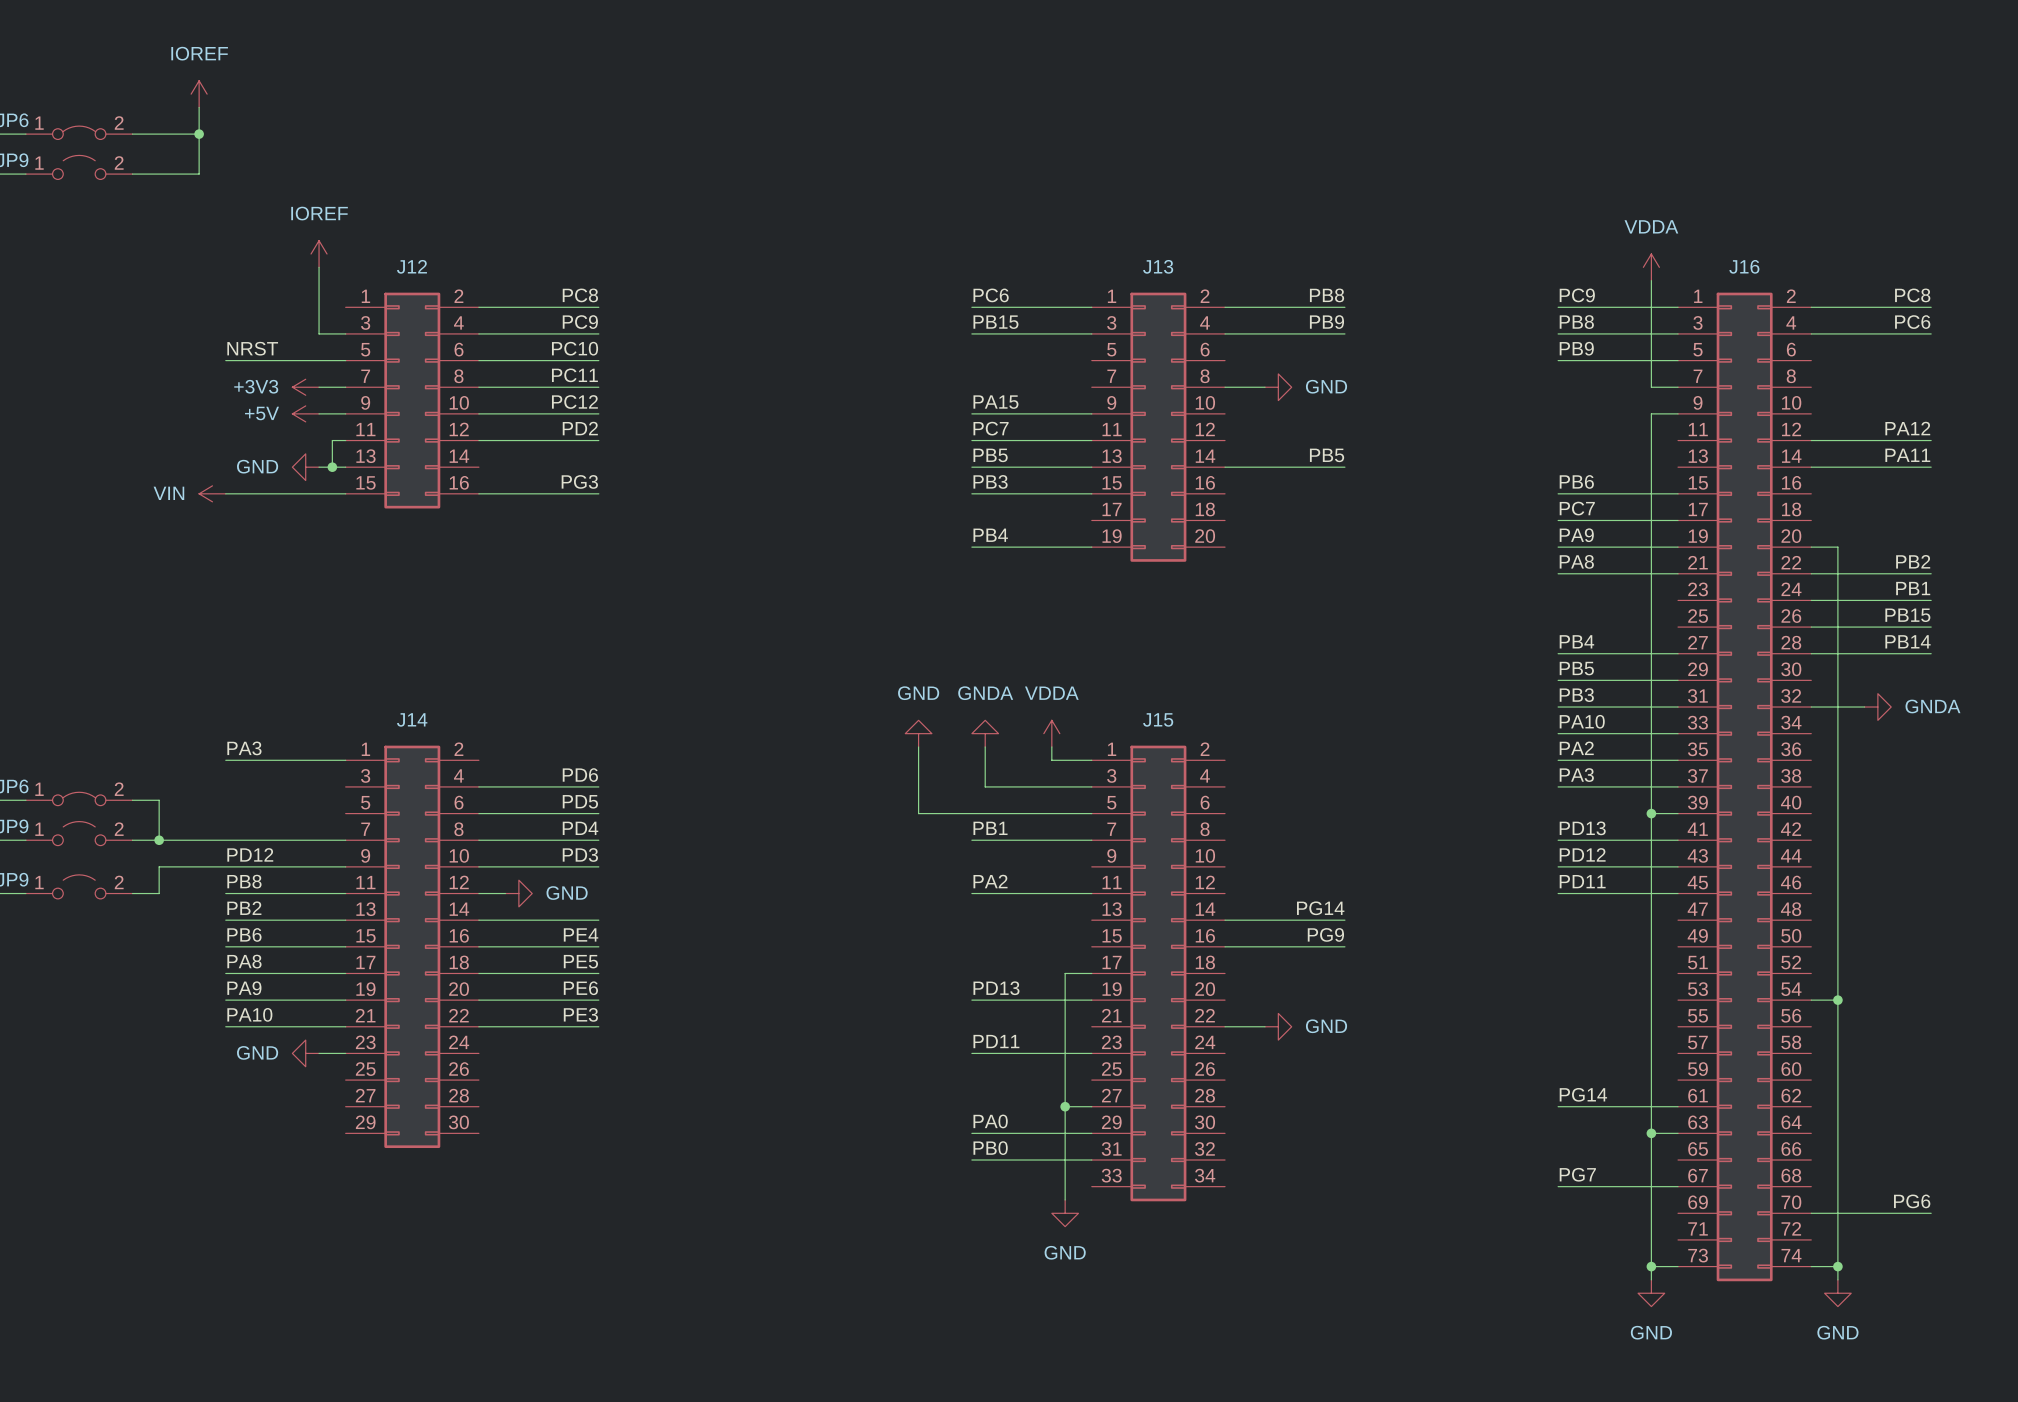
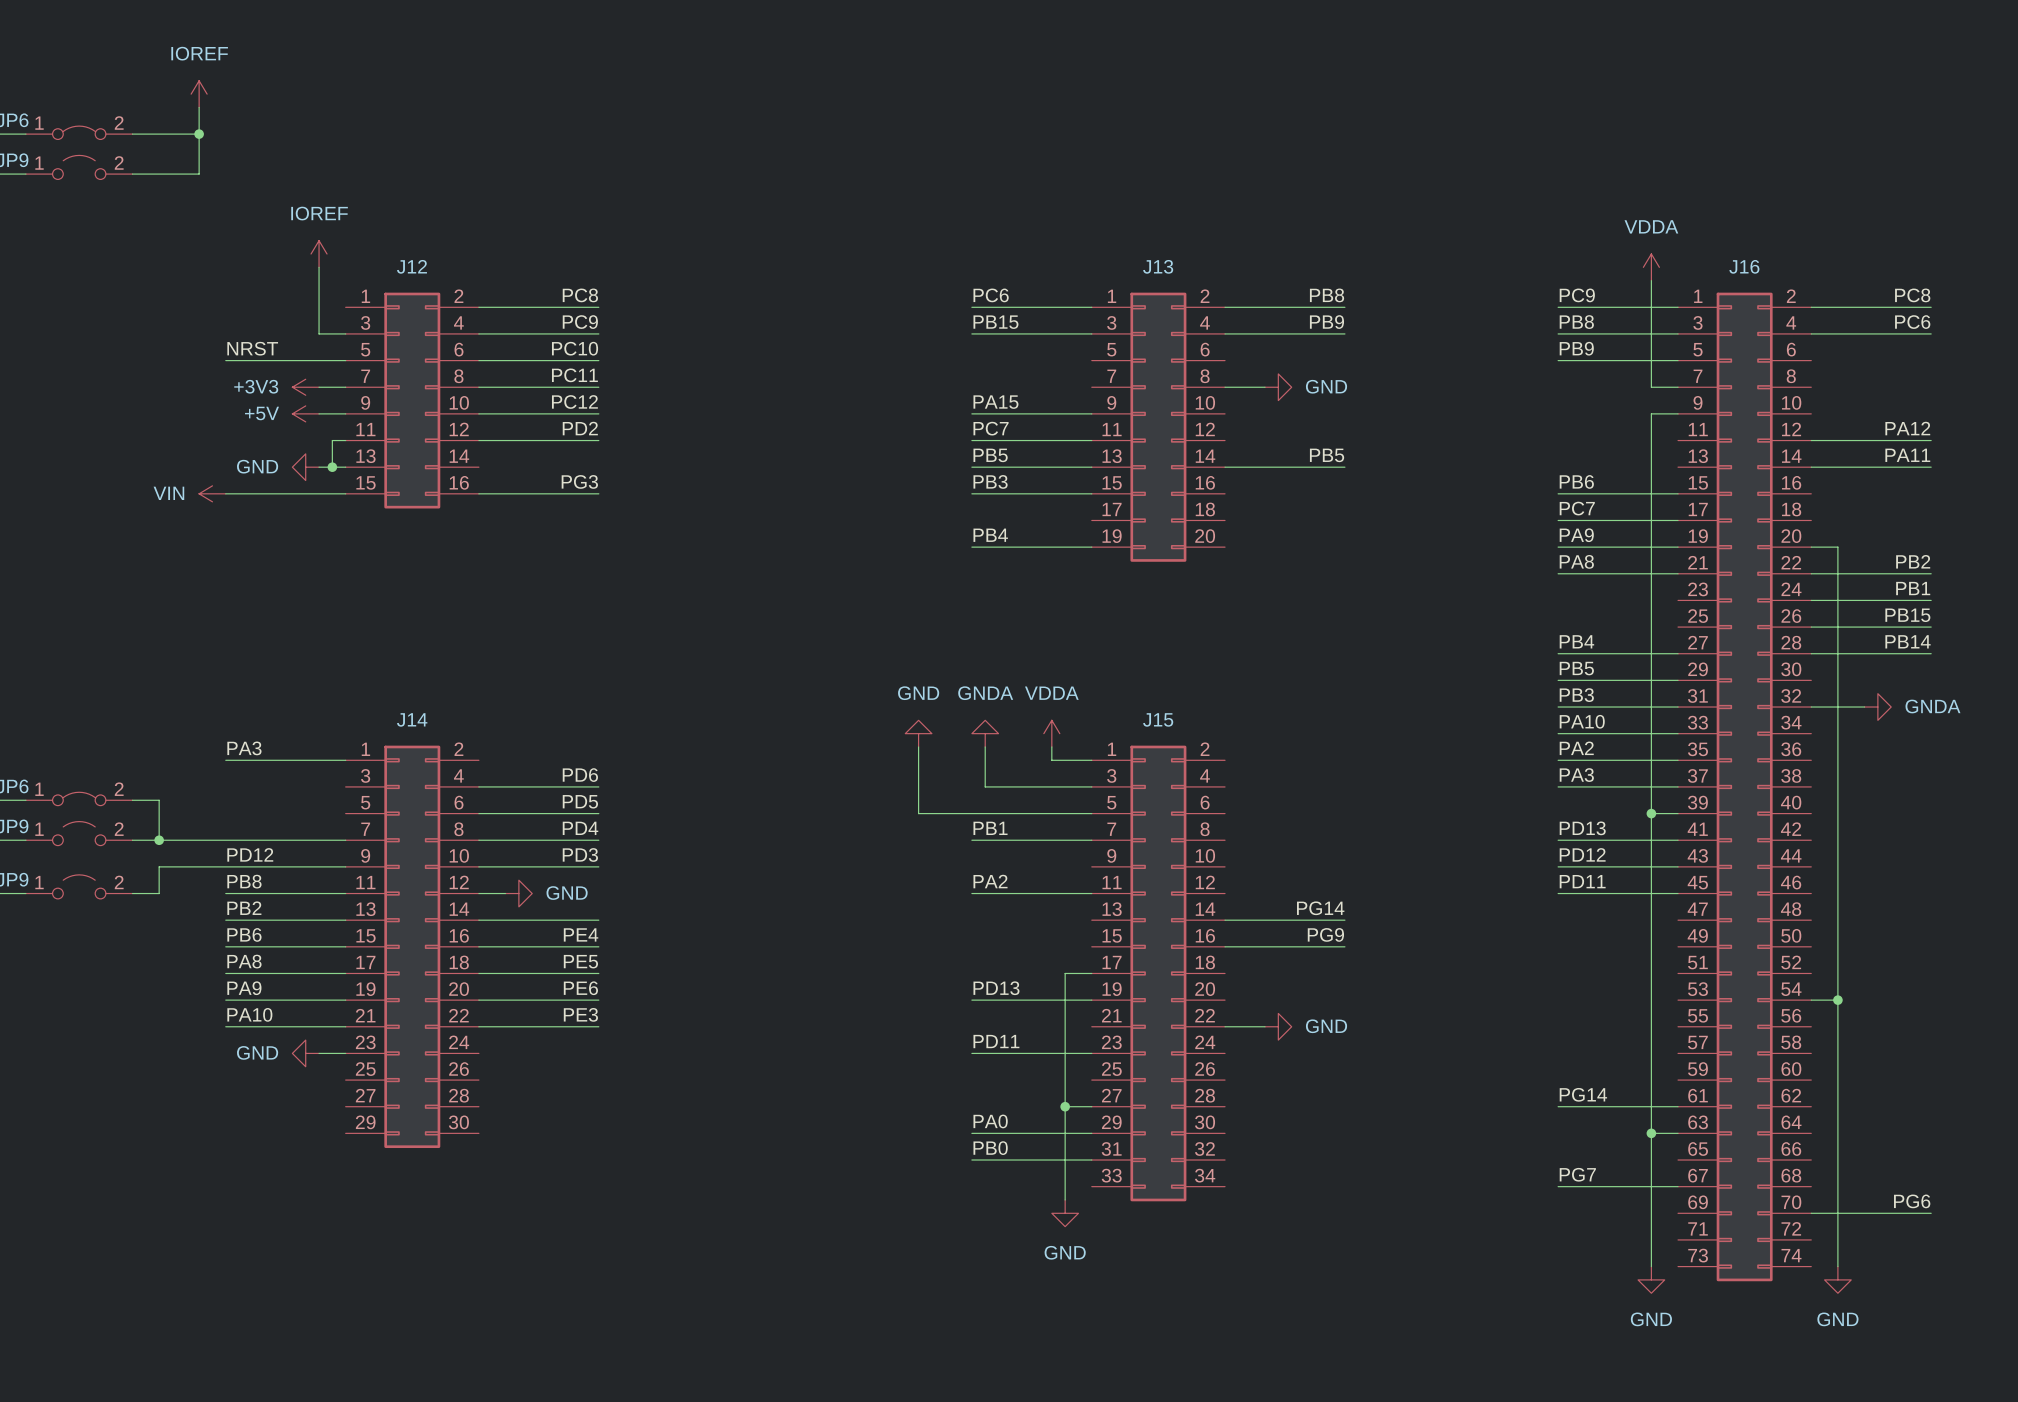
junction: (1651, 1266) -> none
wire: (1678, 1266) (1651, 1266) (1651, 1279) -> none
wire: (1811, 1266) (1837, 1266) (1837, 1279) -> none
junction: (1837, 1266) -> none
power symbol position: GND (1651, 1293) -> GND (1651, 1279)
power symbol position: GND (1837, 1293) -> GND (1837, 1279)

